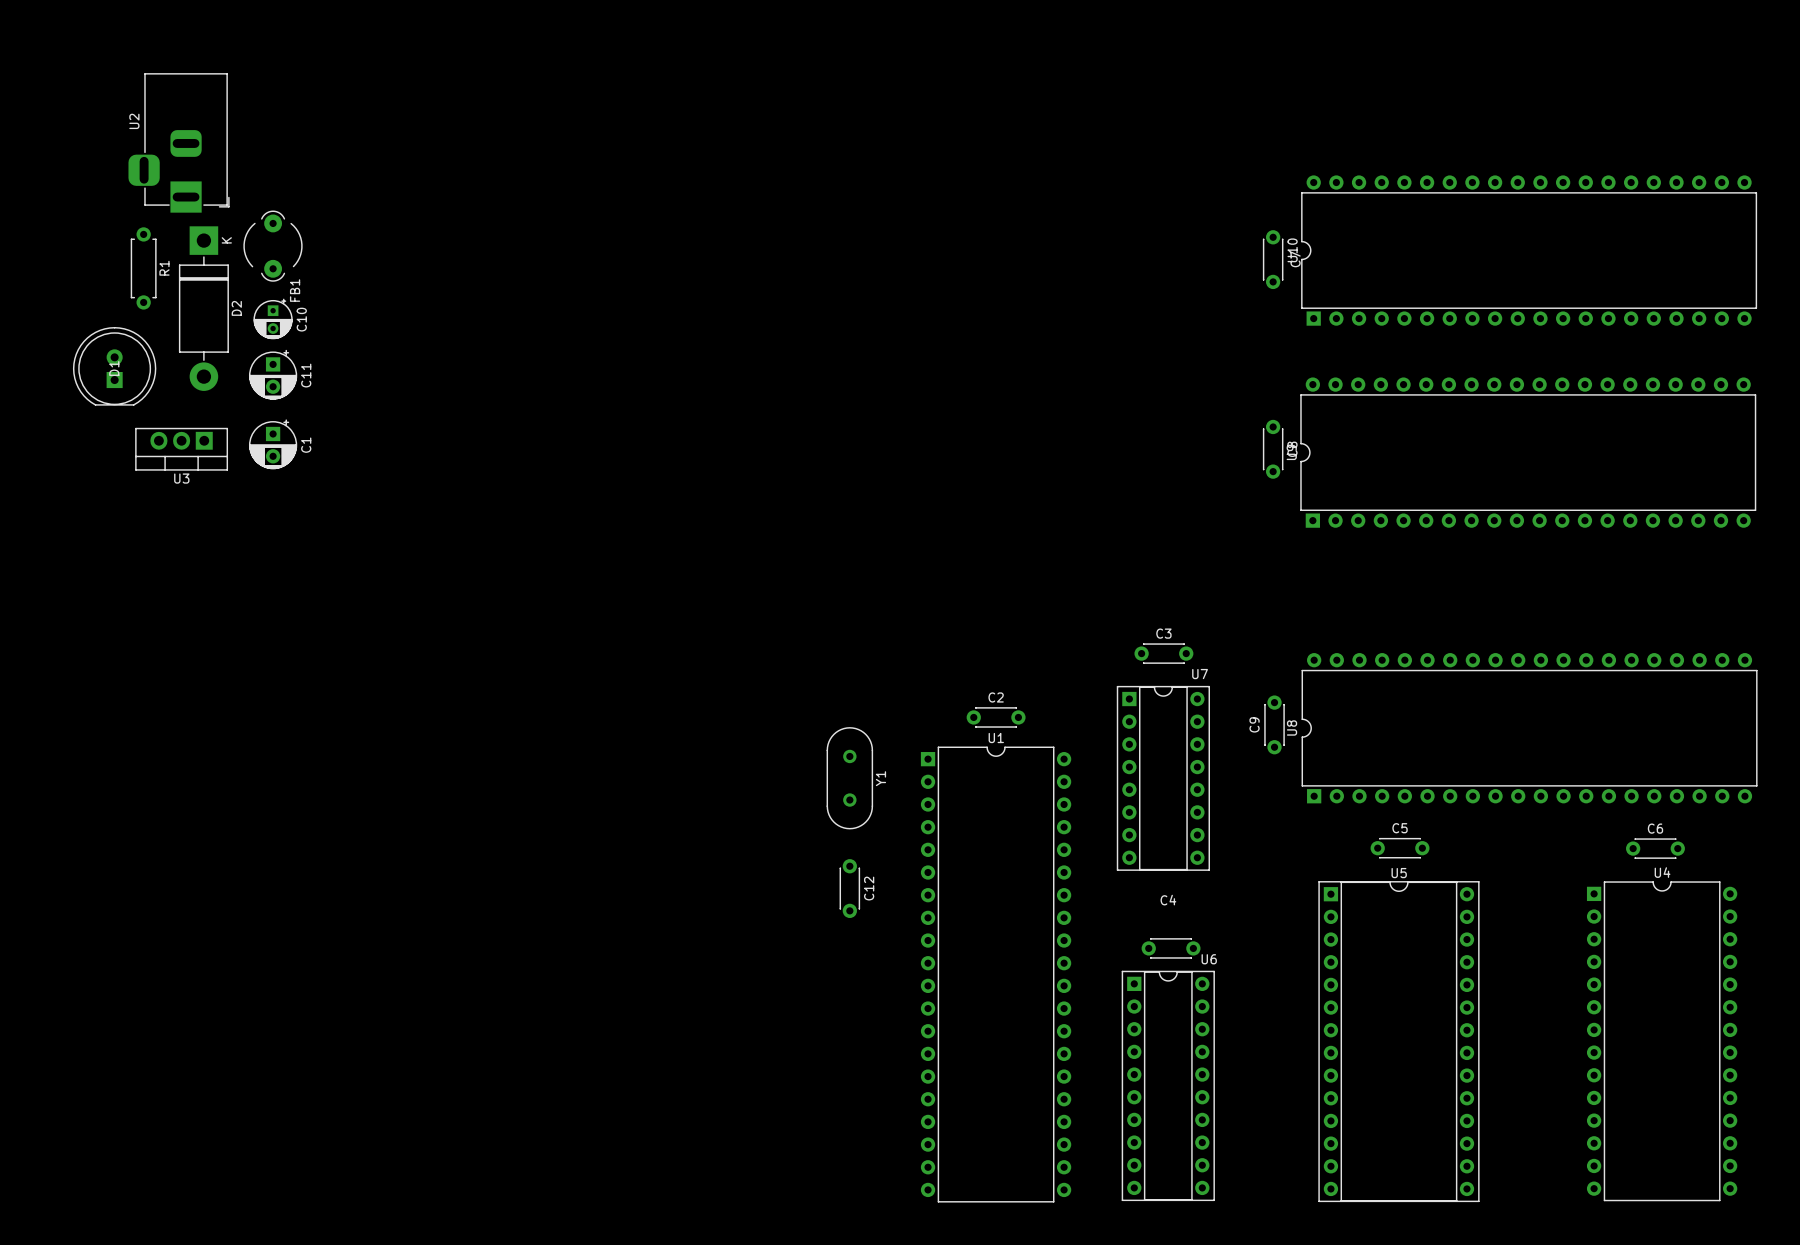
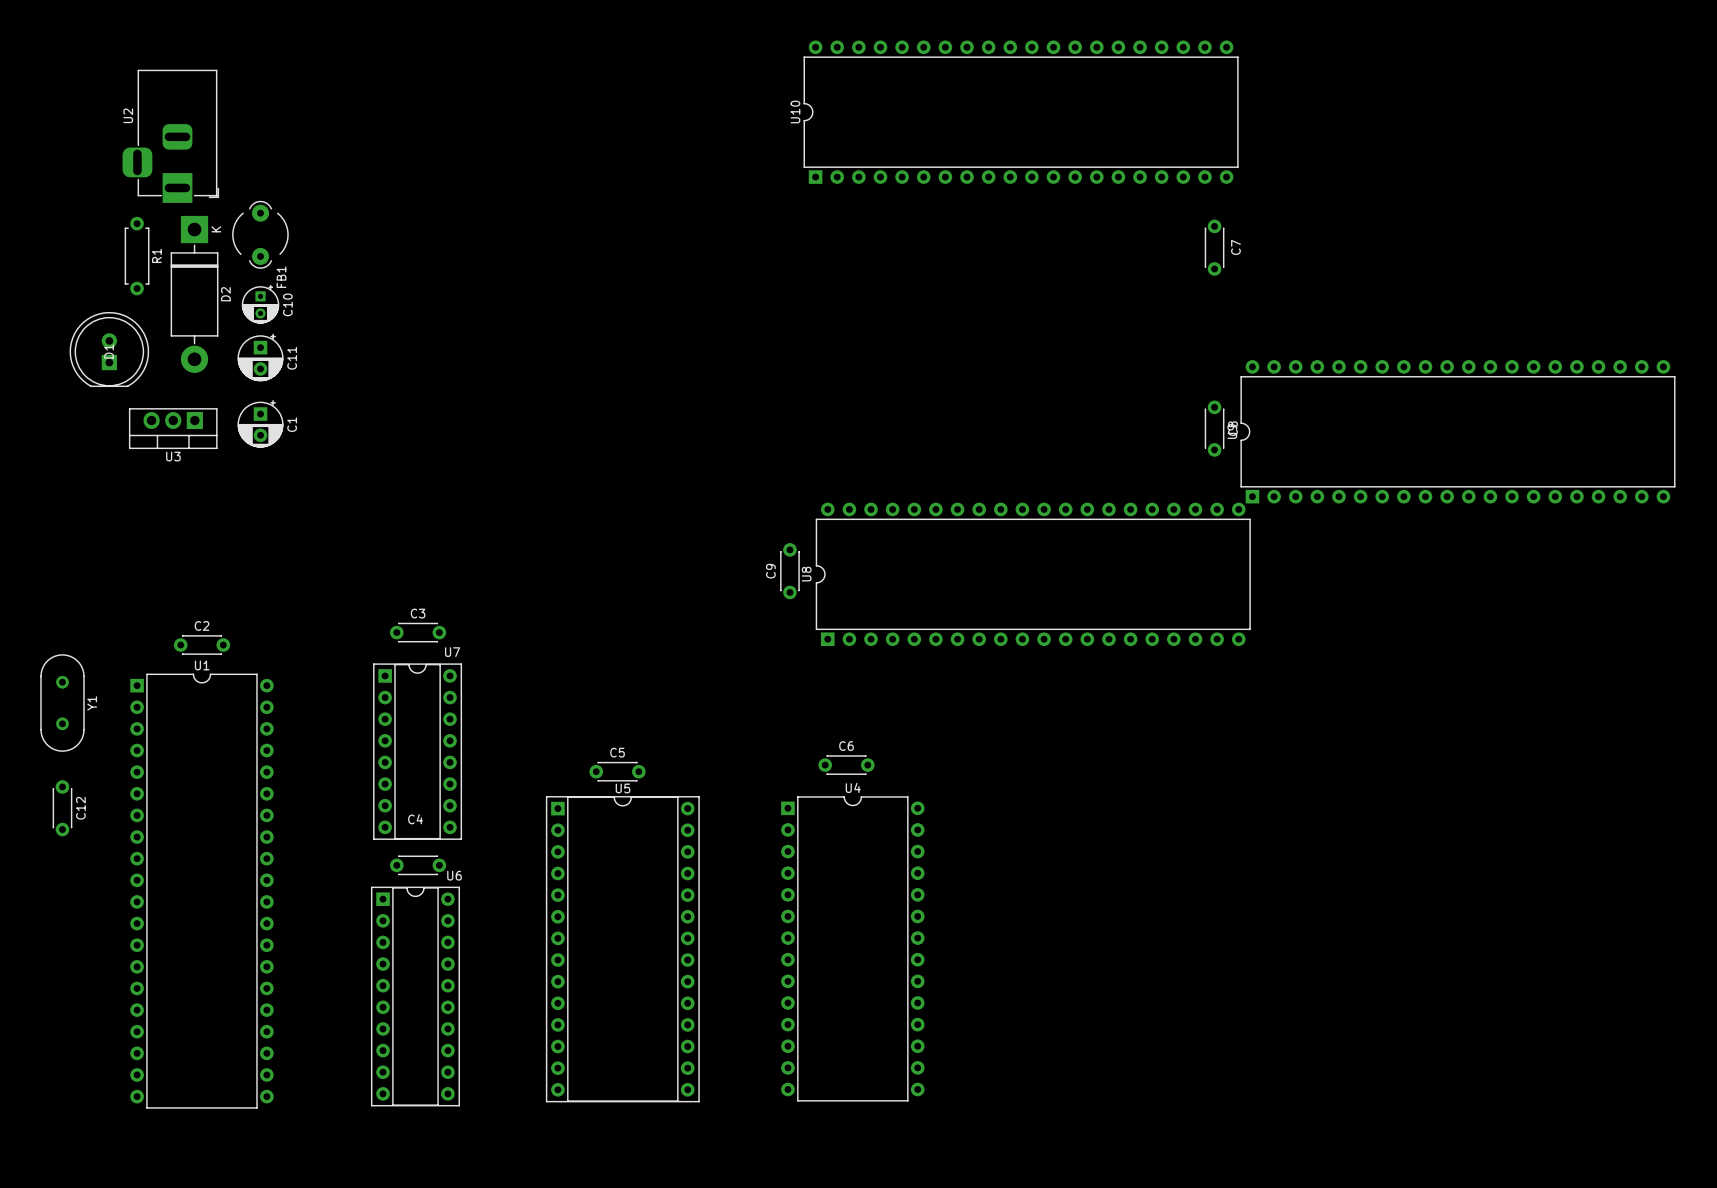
U10 position: (1529, 250) -> (1021, 112)
C3 position: (1163, 653) -> (418, 632)
C2 position: (996, 717) -> (202, 645)
C9 position: (1274, 724) -> (789, 571)
U8 position: (1529, 728) -> (1033, 574)
Y1 position: (849, 778) -> (62, 703)
U7 position: (1163, 778) -> (417, 751)
C5 position: (1400, 848) -> (617, 771)
C6 position: (1655, 848) -> (846, 765)
C12 position: (849, 888) -> (62, 808)
C4 position: (1171, 948) -> (418, 865)
U1 position: (996, 974) -> (201, 891)
U5 position: (1398, 1041) -> (622, 949)
U4 position: (1662, 1041) -> (852, 948)
U6 position: (1168, 1085) -> (415, 996)

